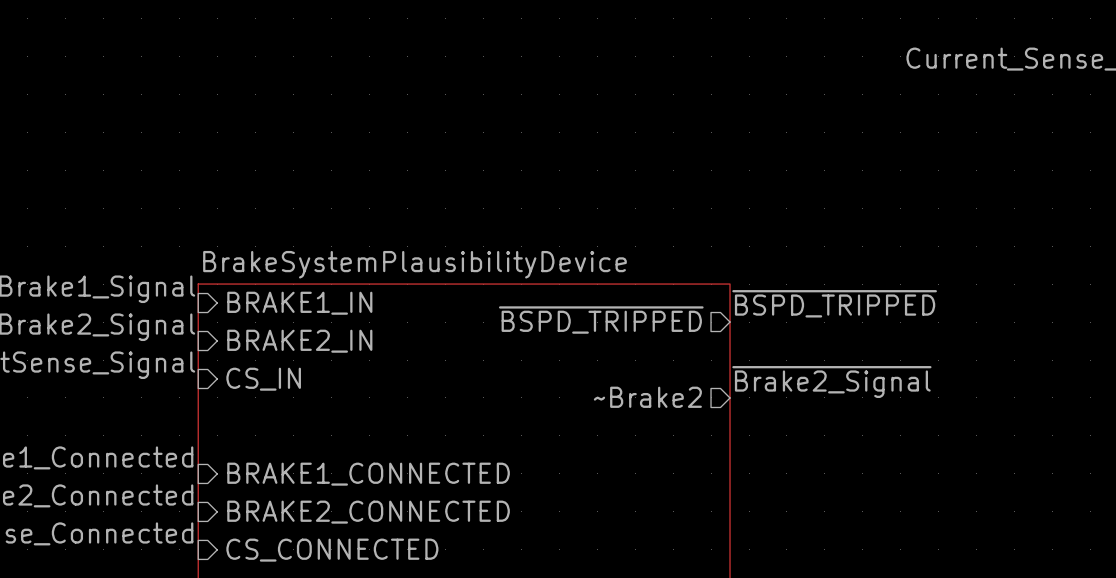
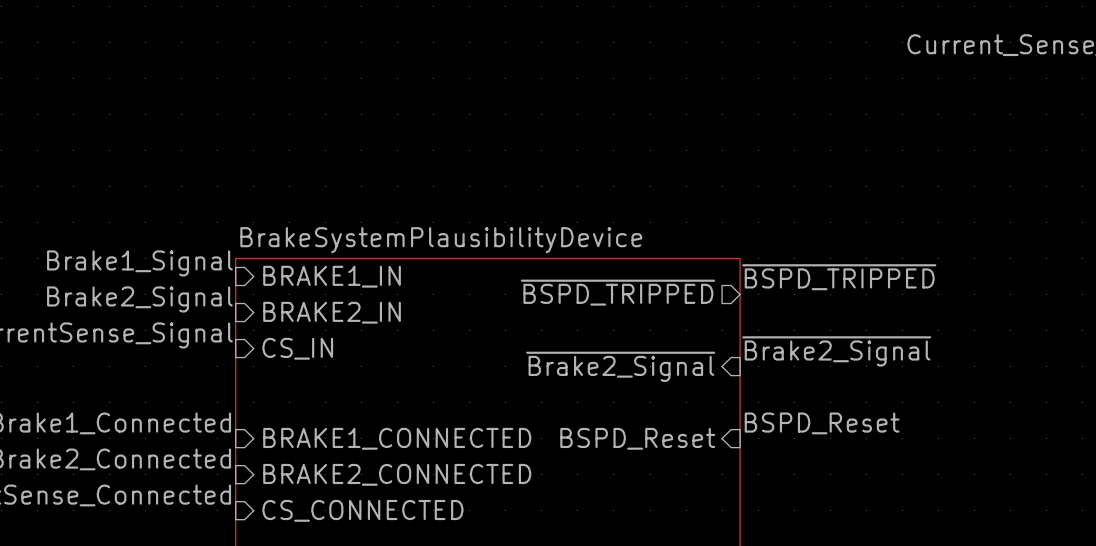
hierarchical label: ~Brake2 (647, 397) -> none
sheet pin: none -> ~{Brake2_Signal} (620, 366)
label: none -> BSPD_Reset (822, 423)
sheet pin: none -> BSPD_Reset (637, 438)

